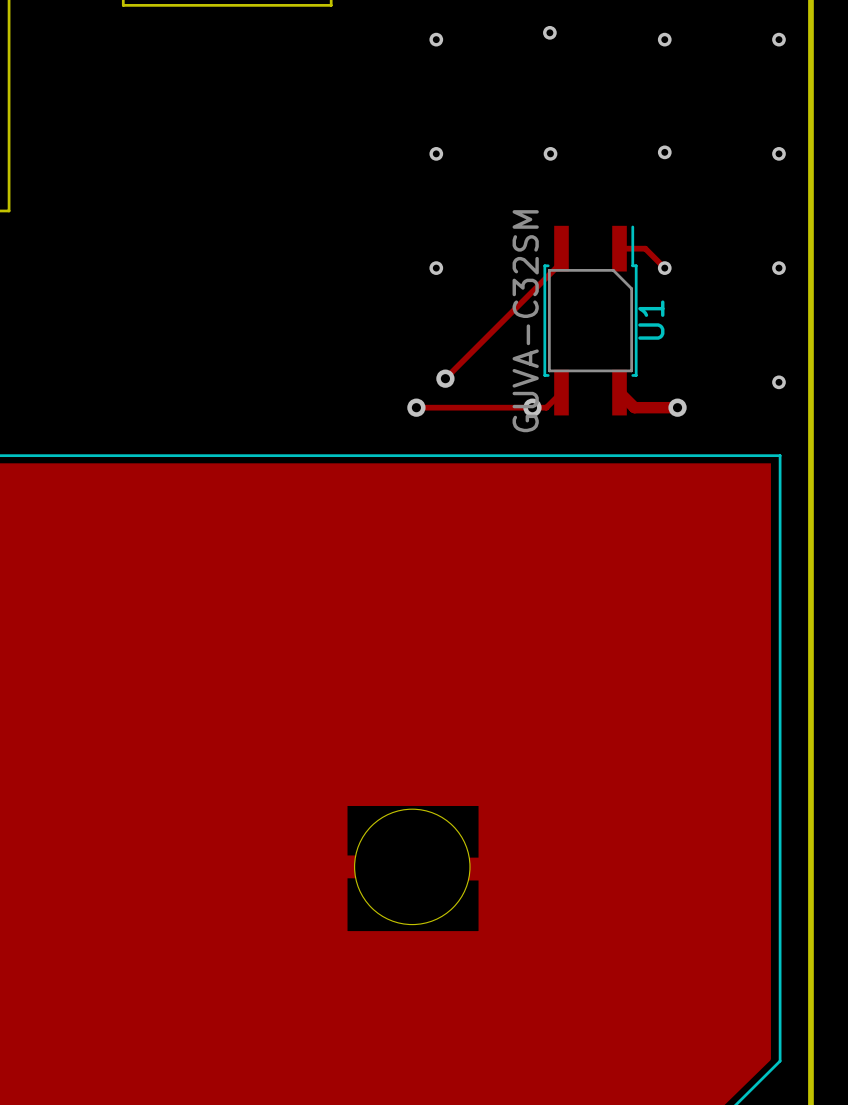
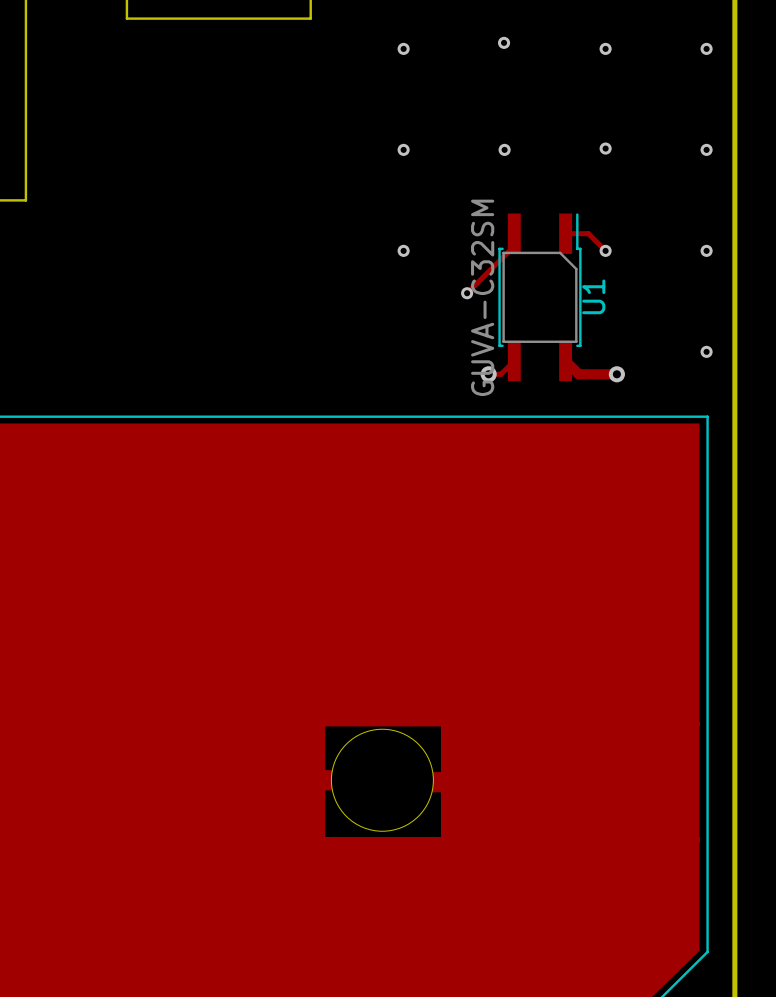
track: (508, 315) (445, 378) -> none
via: none -> (467, 293)
via: (445, 378) -> none
track: (416, 407) (532, 407) -> none
via: (416, 407) -> none

